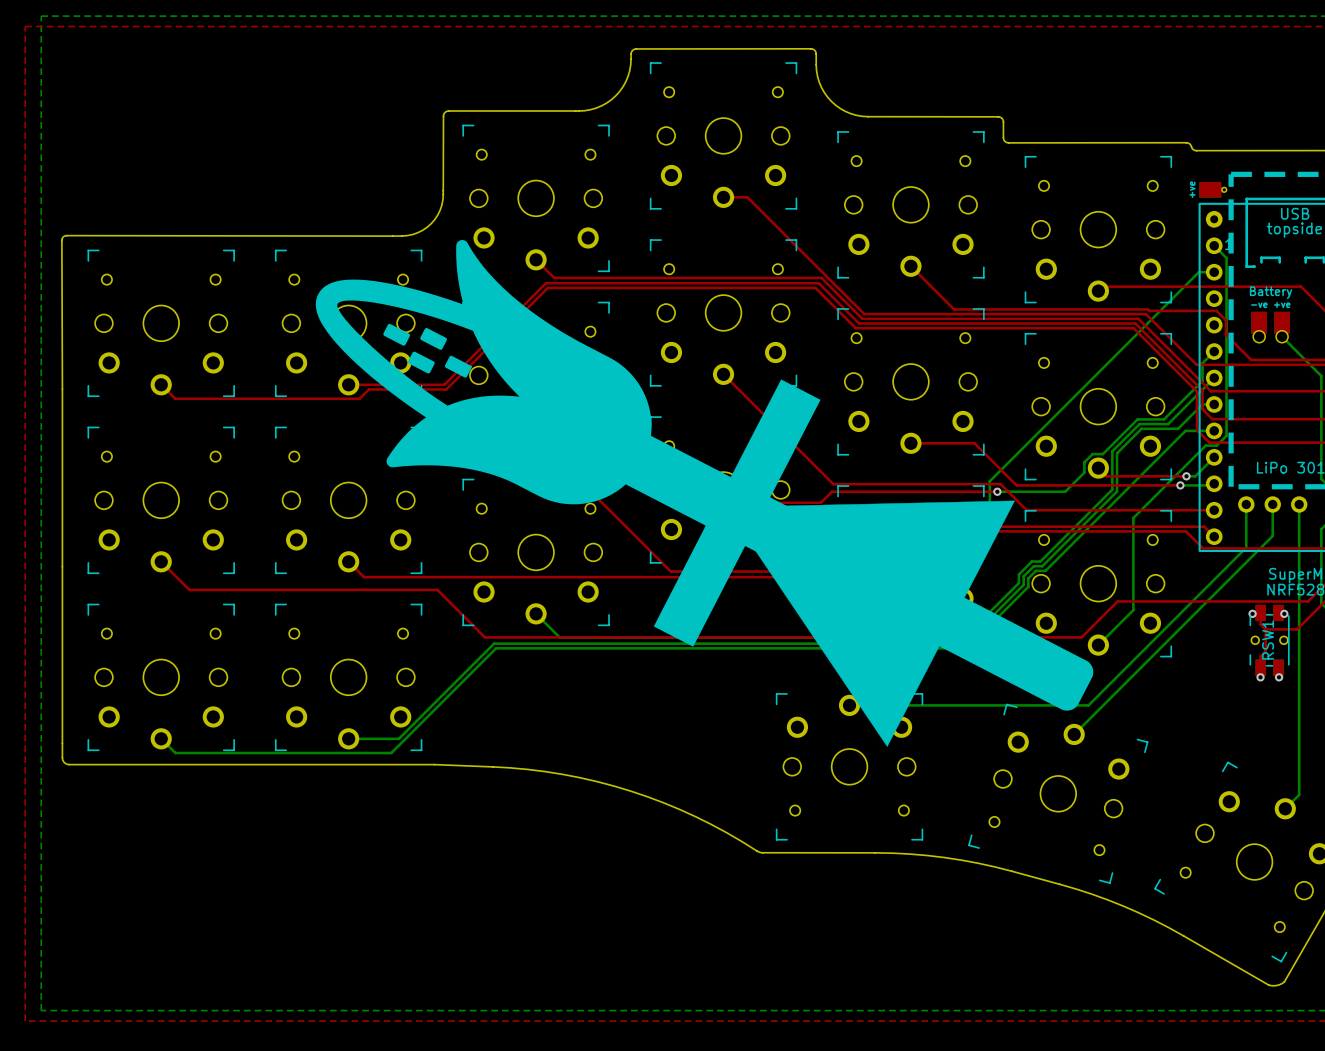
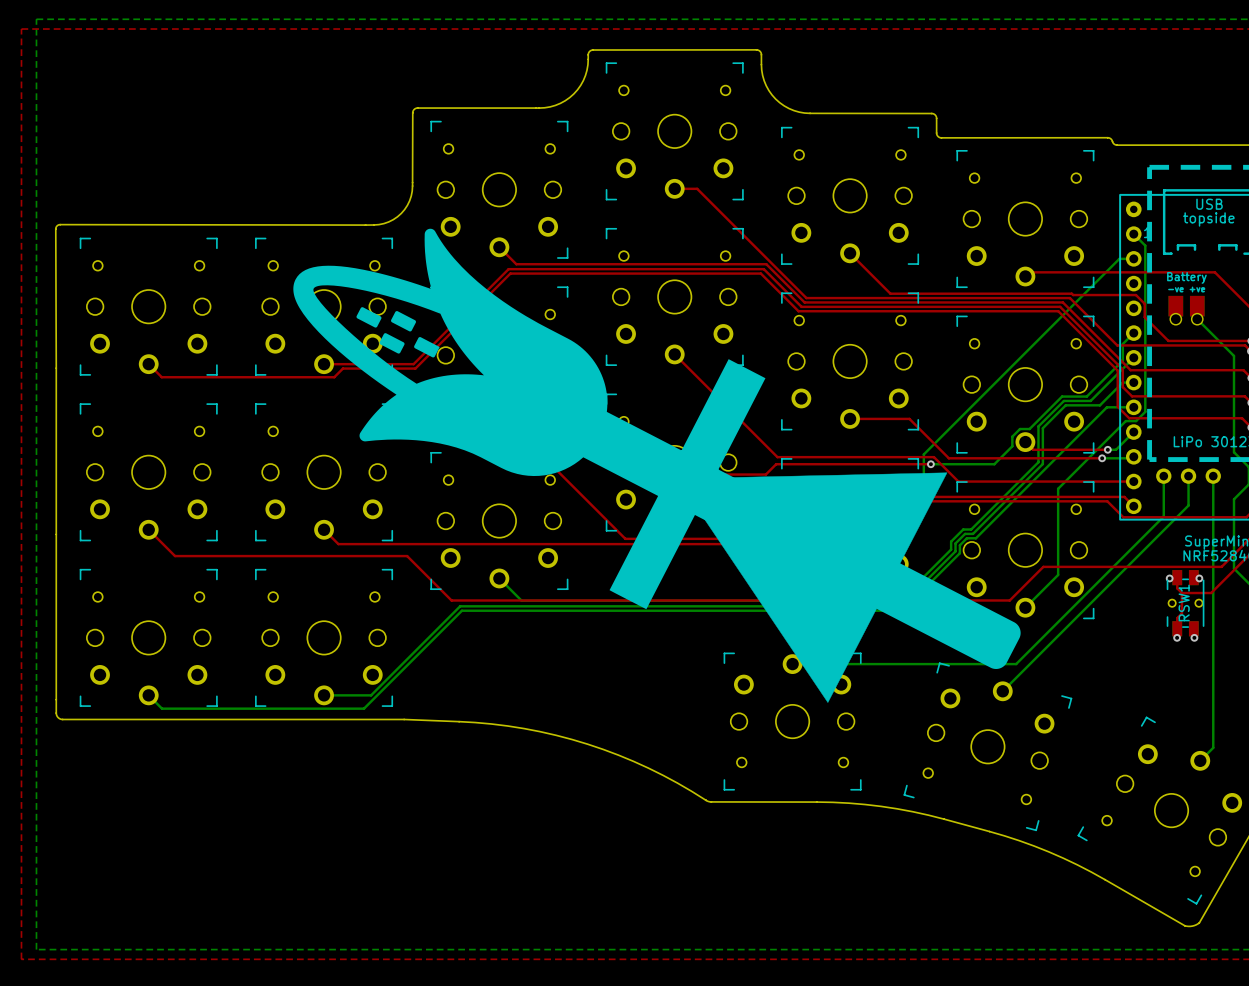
part: (1213, 189) -> none

